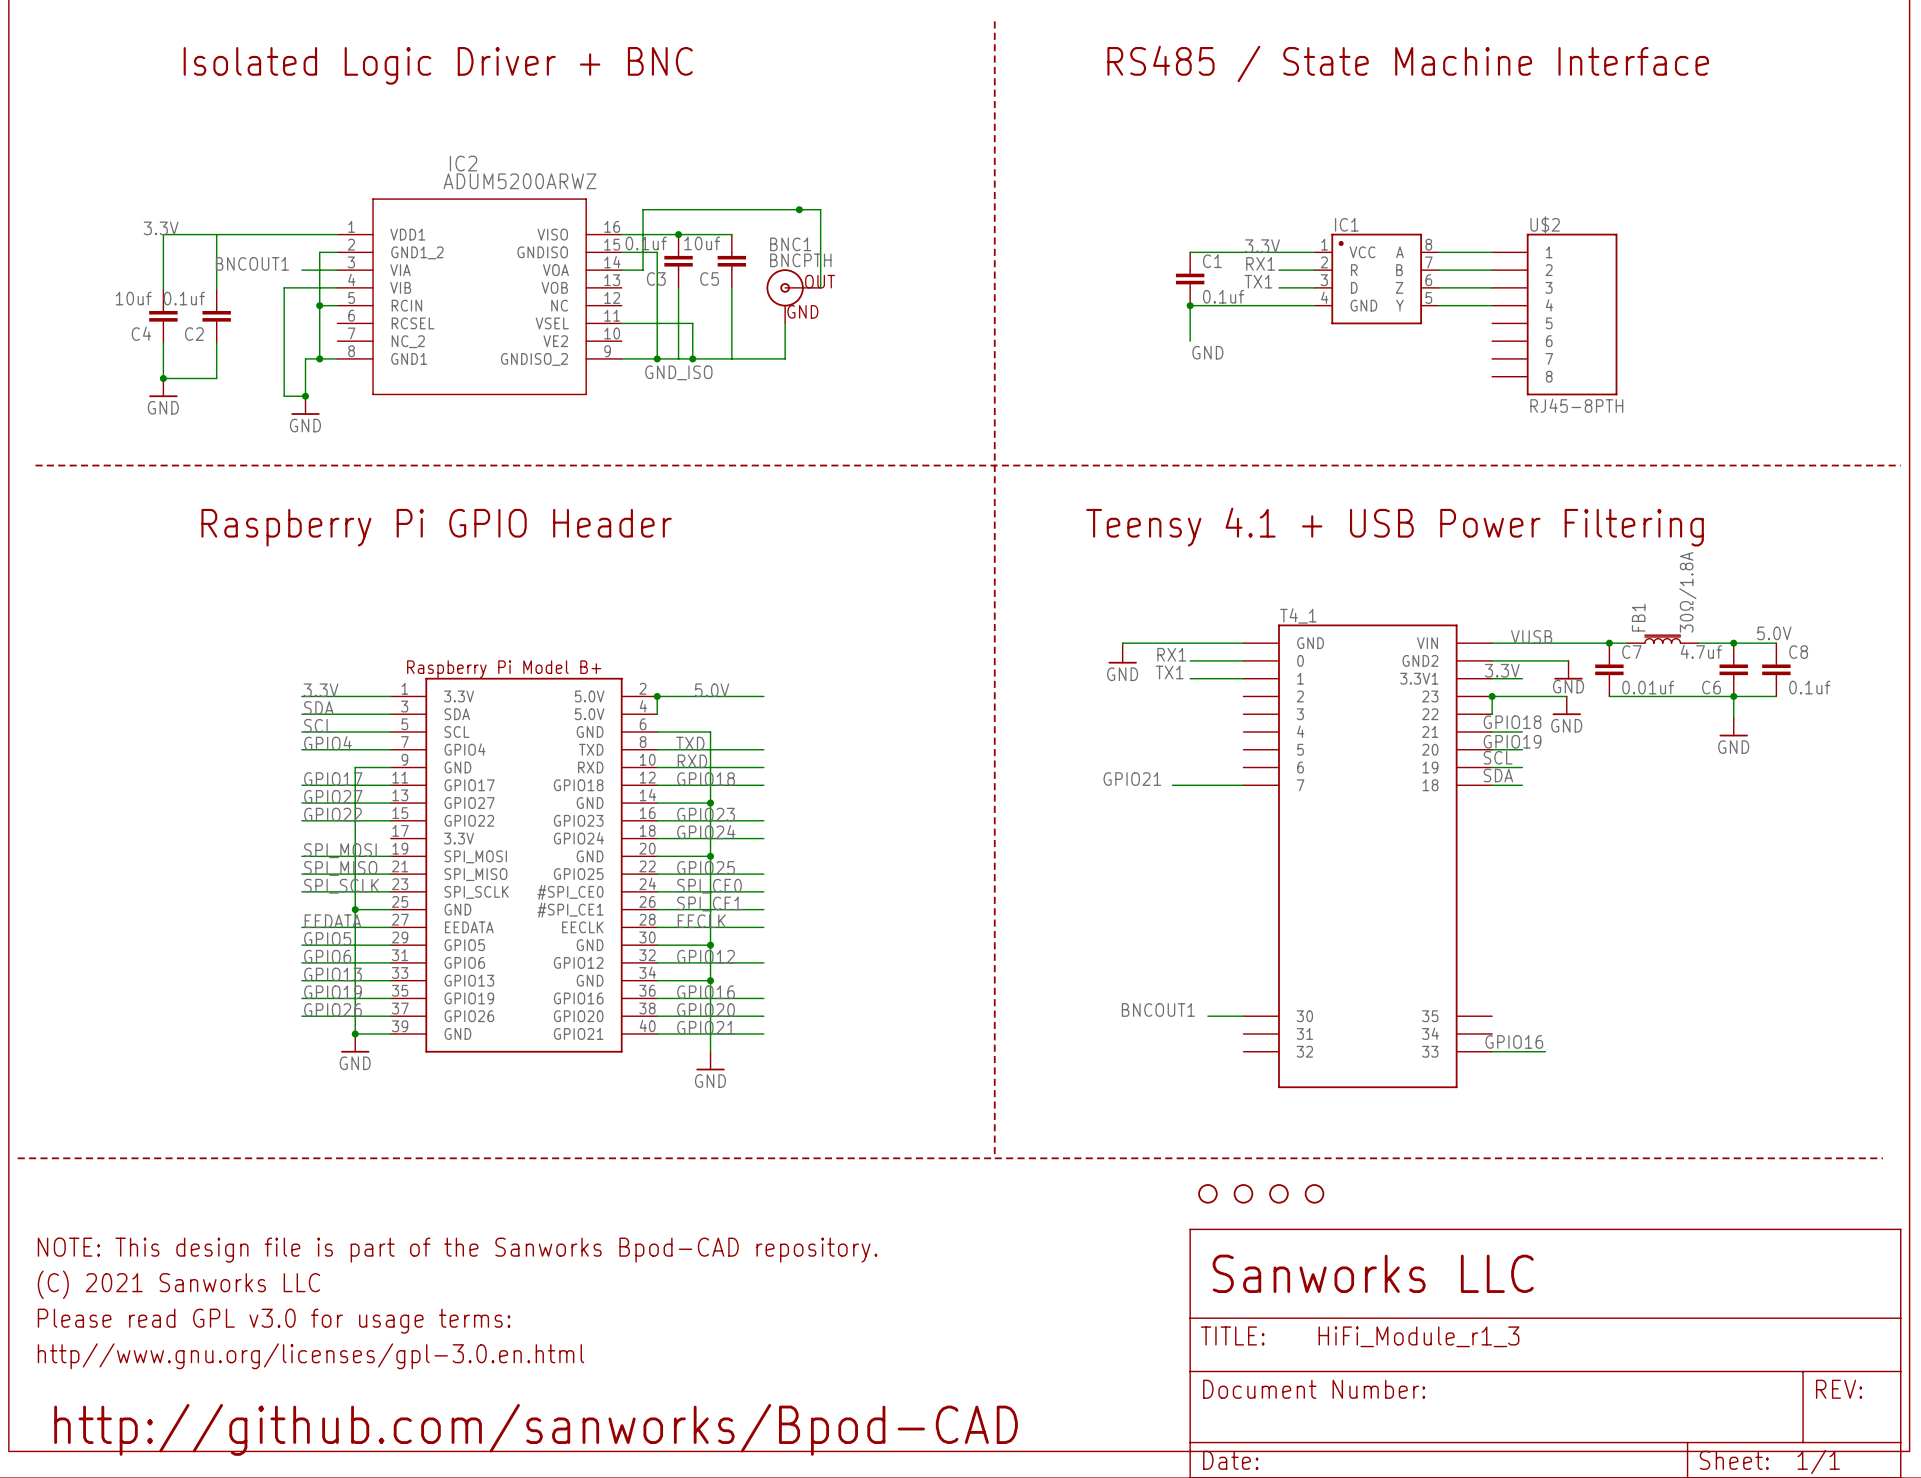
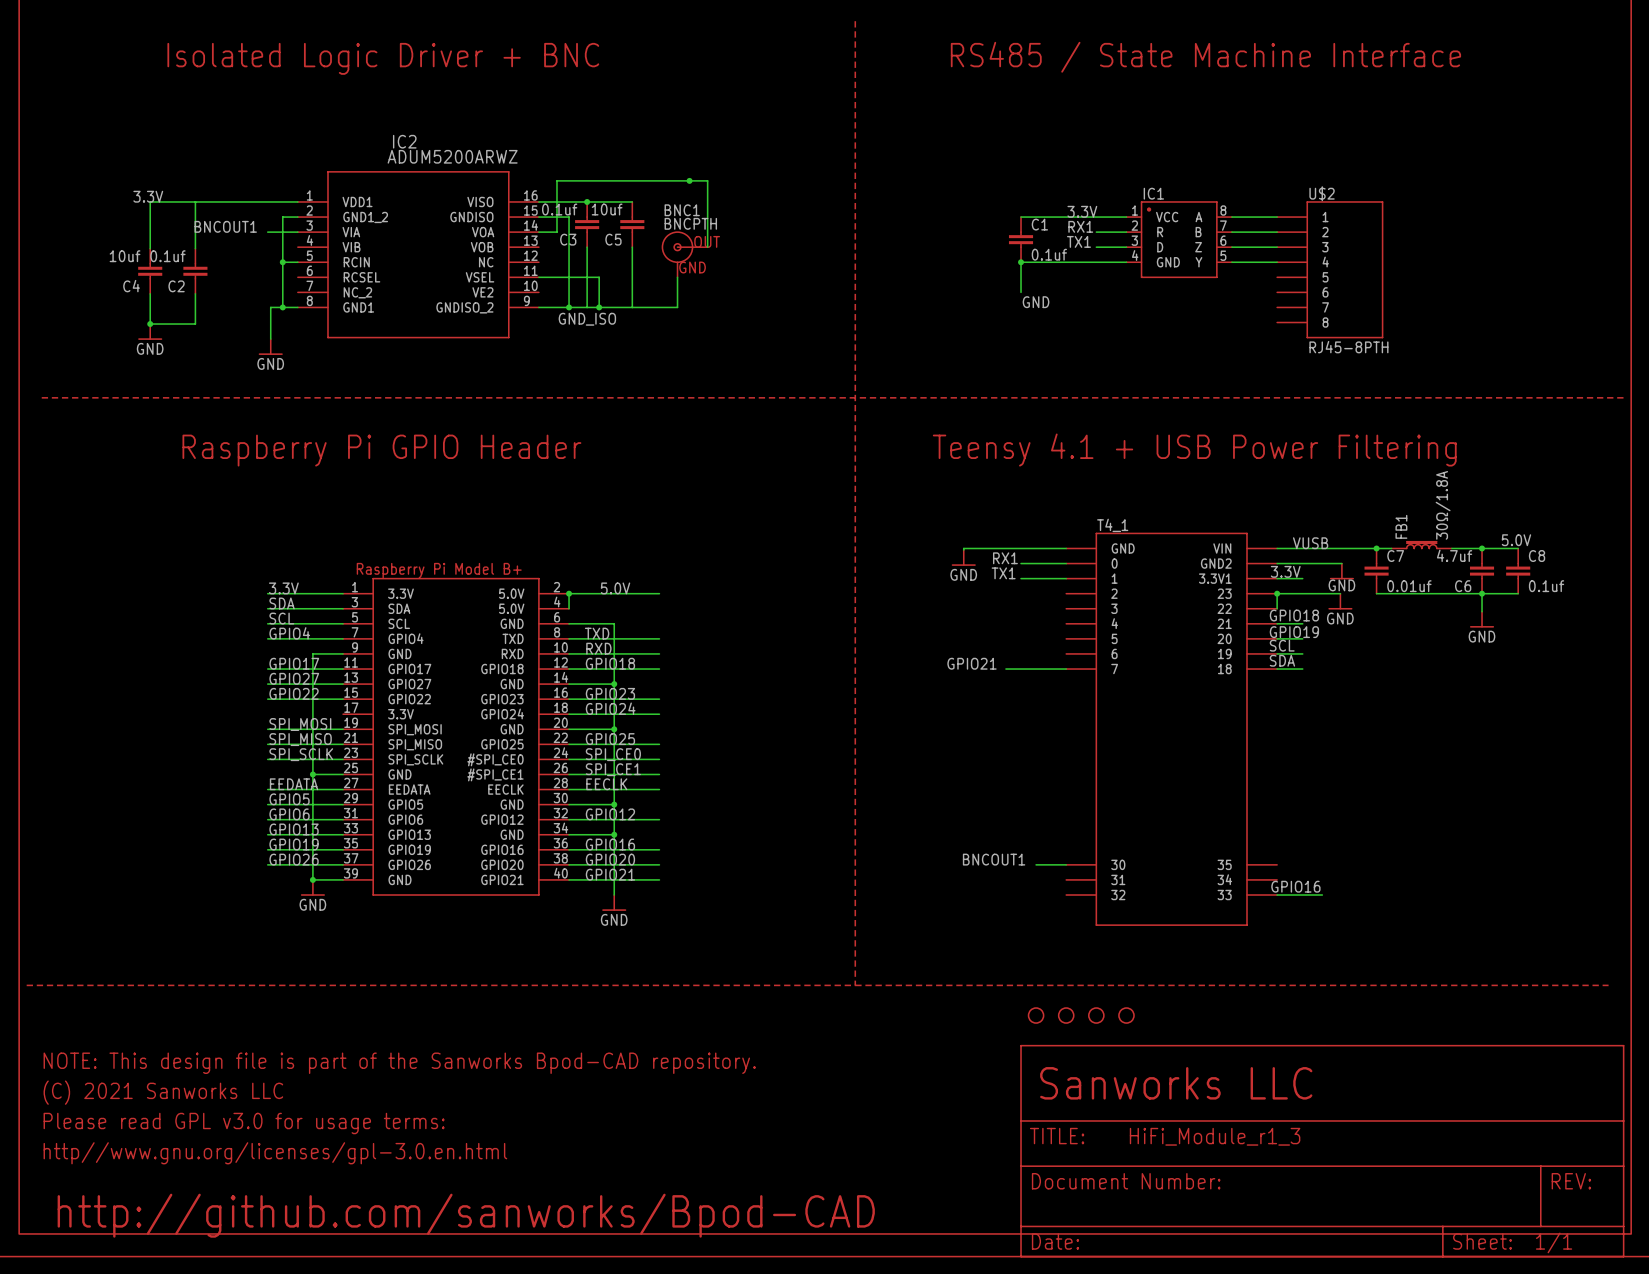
wire: (337, 287) (284, 287) (284, 396) (305, 396) -> none
junction: (305, 396) -> none

